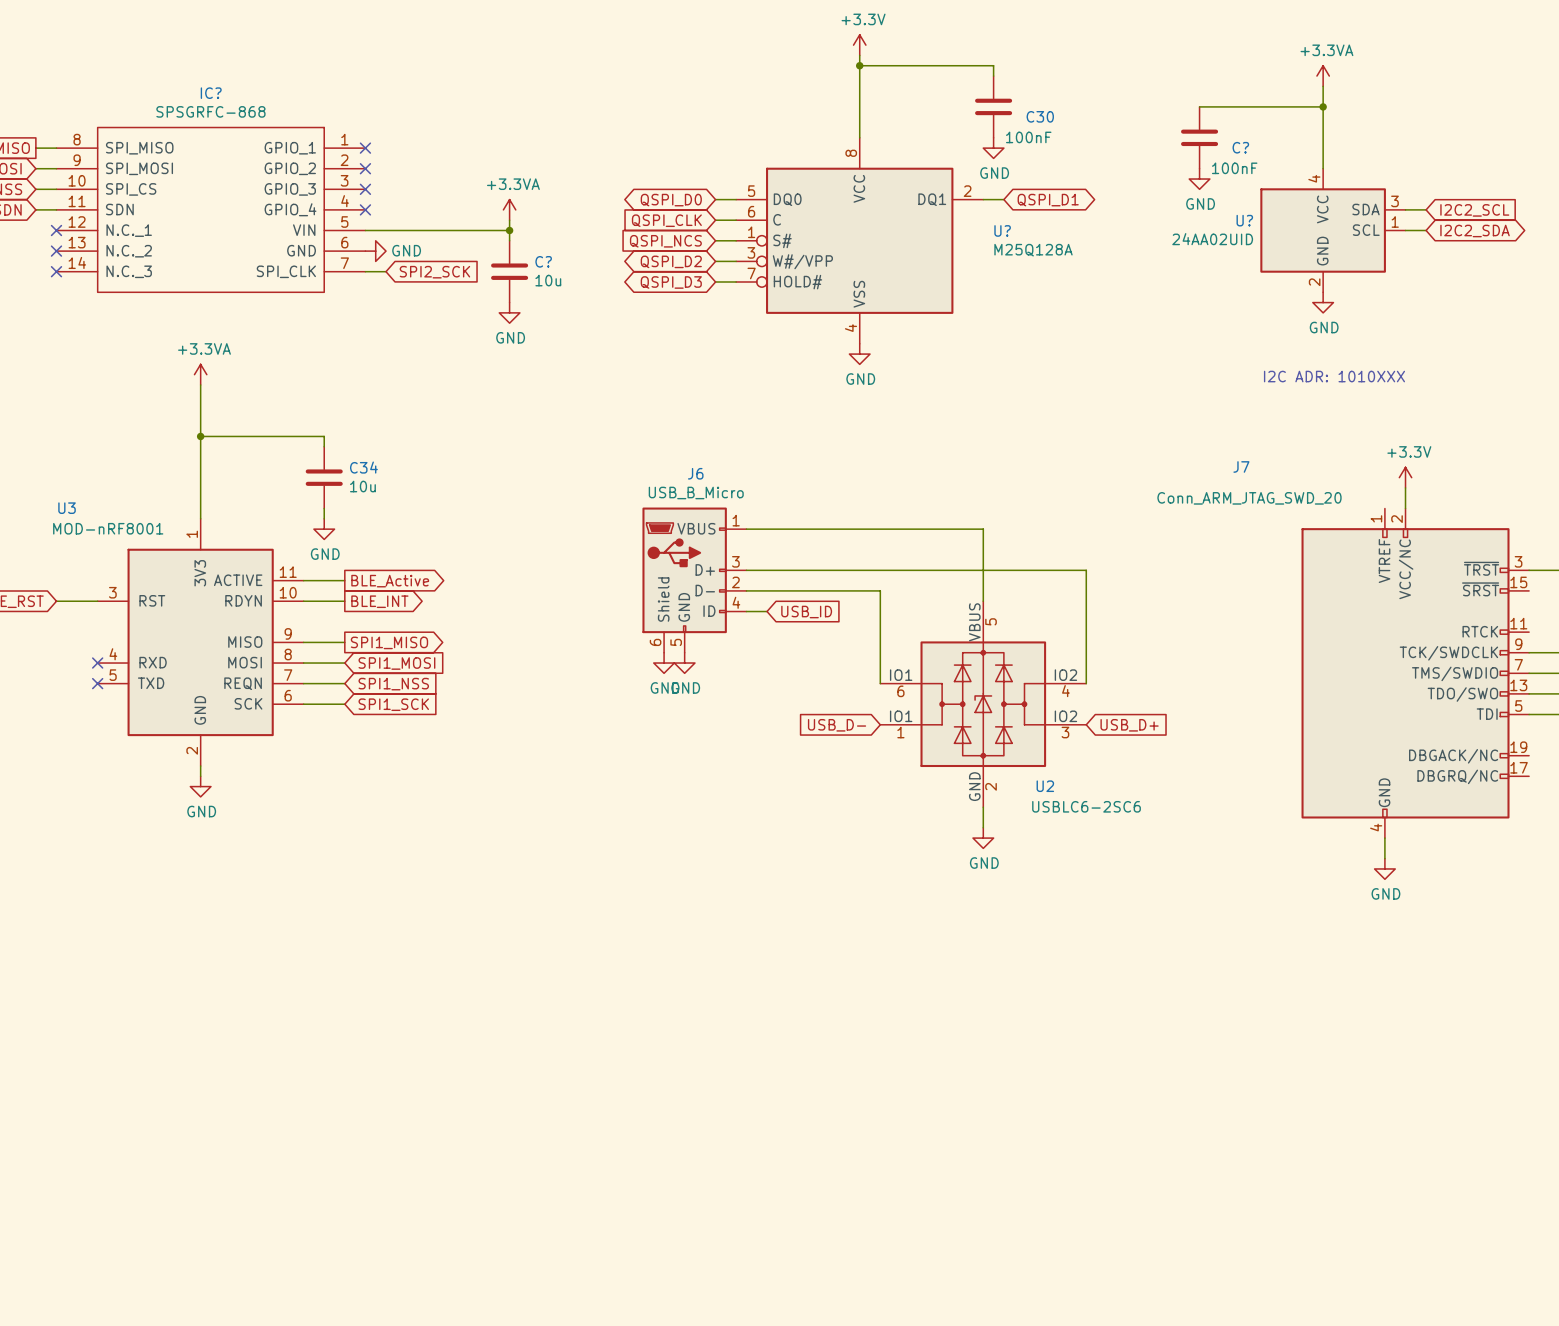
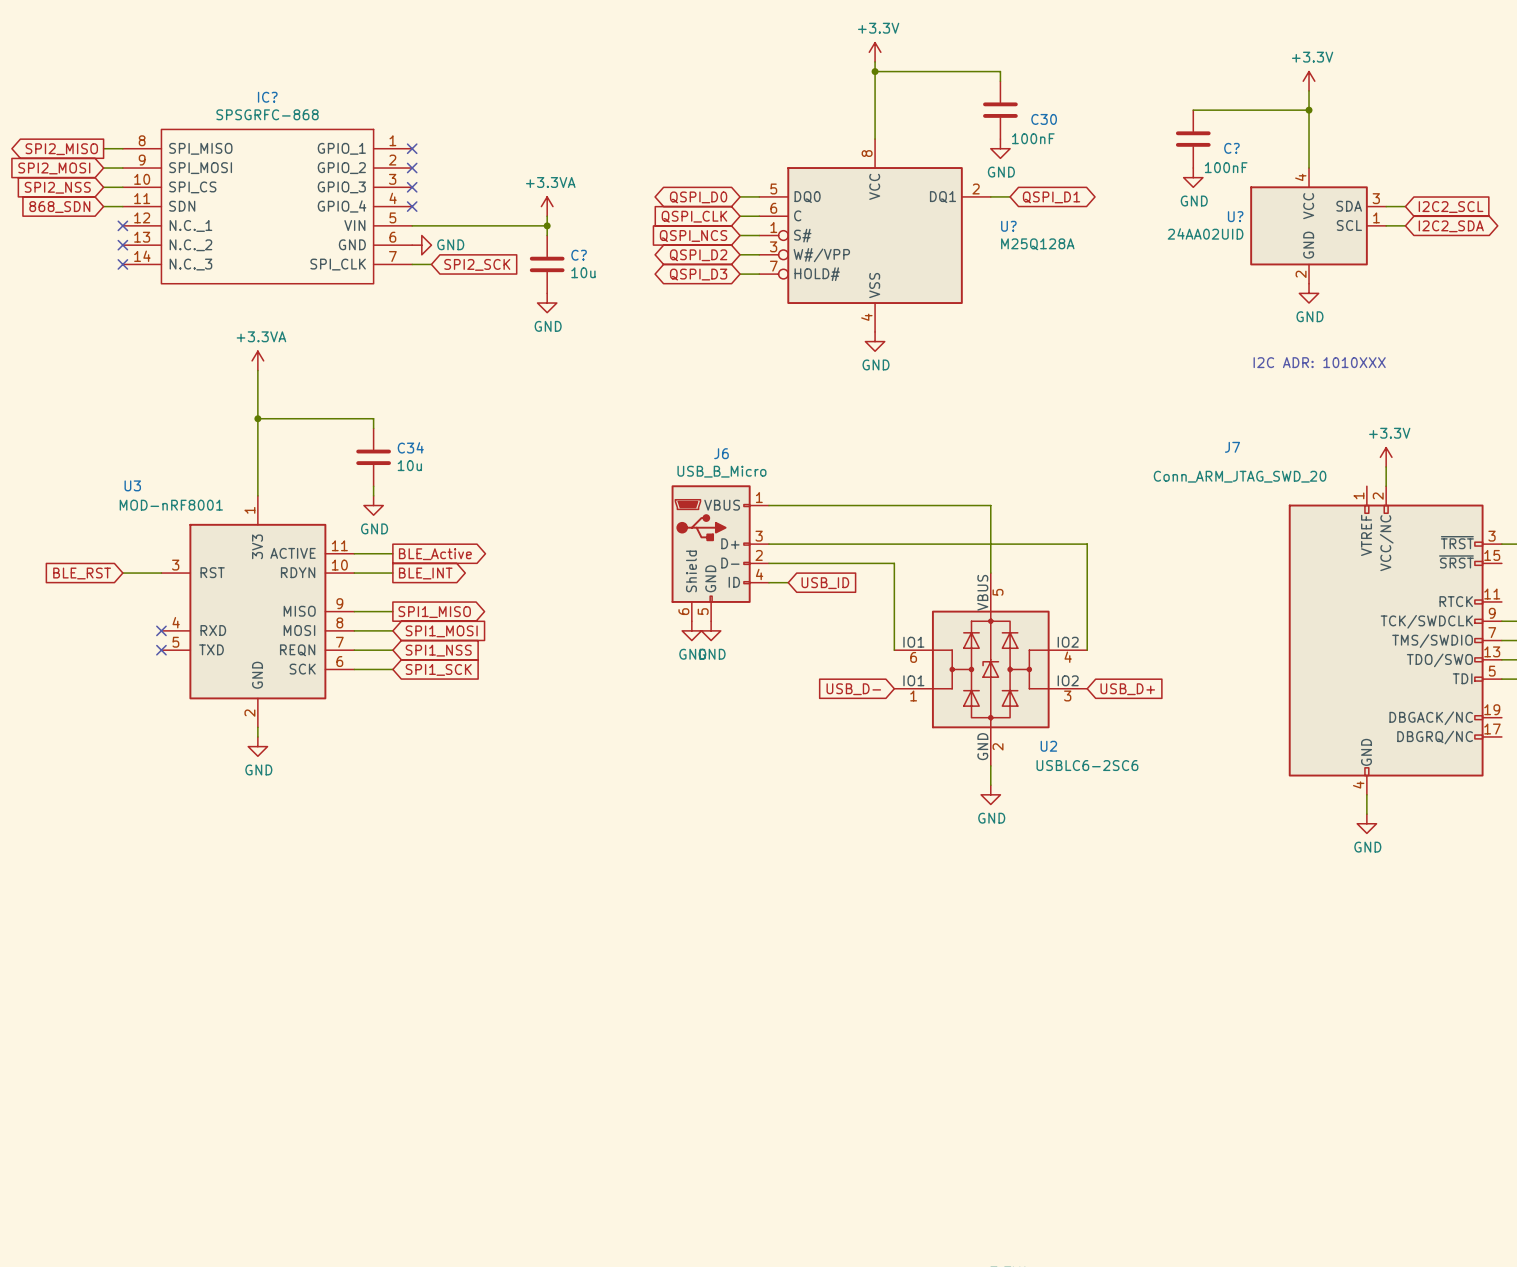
power symbol: +3.3VA (1323, 76) -> +3.3V (1309, 81)

